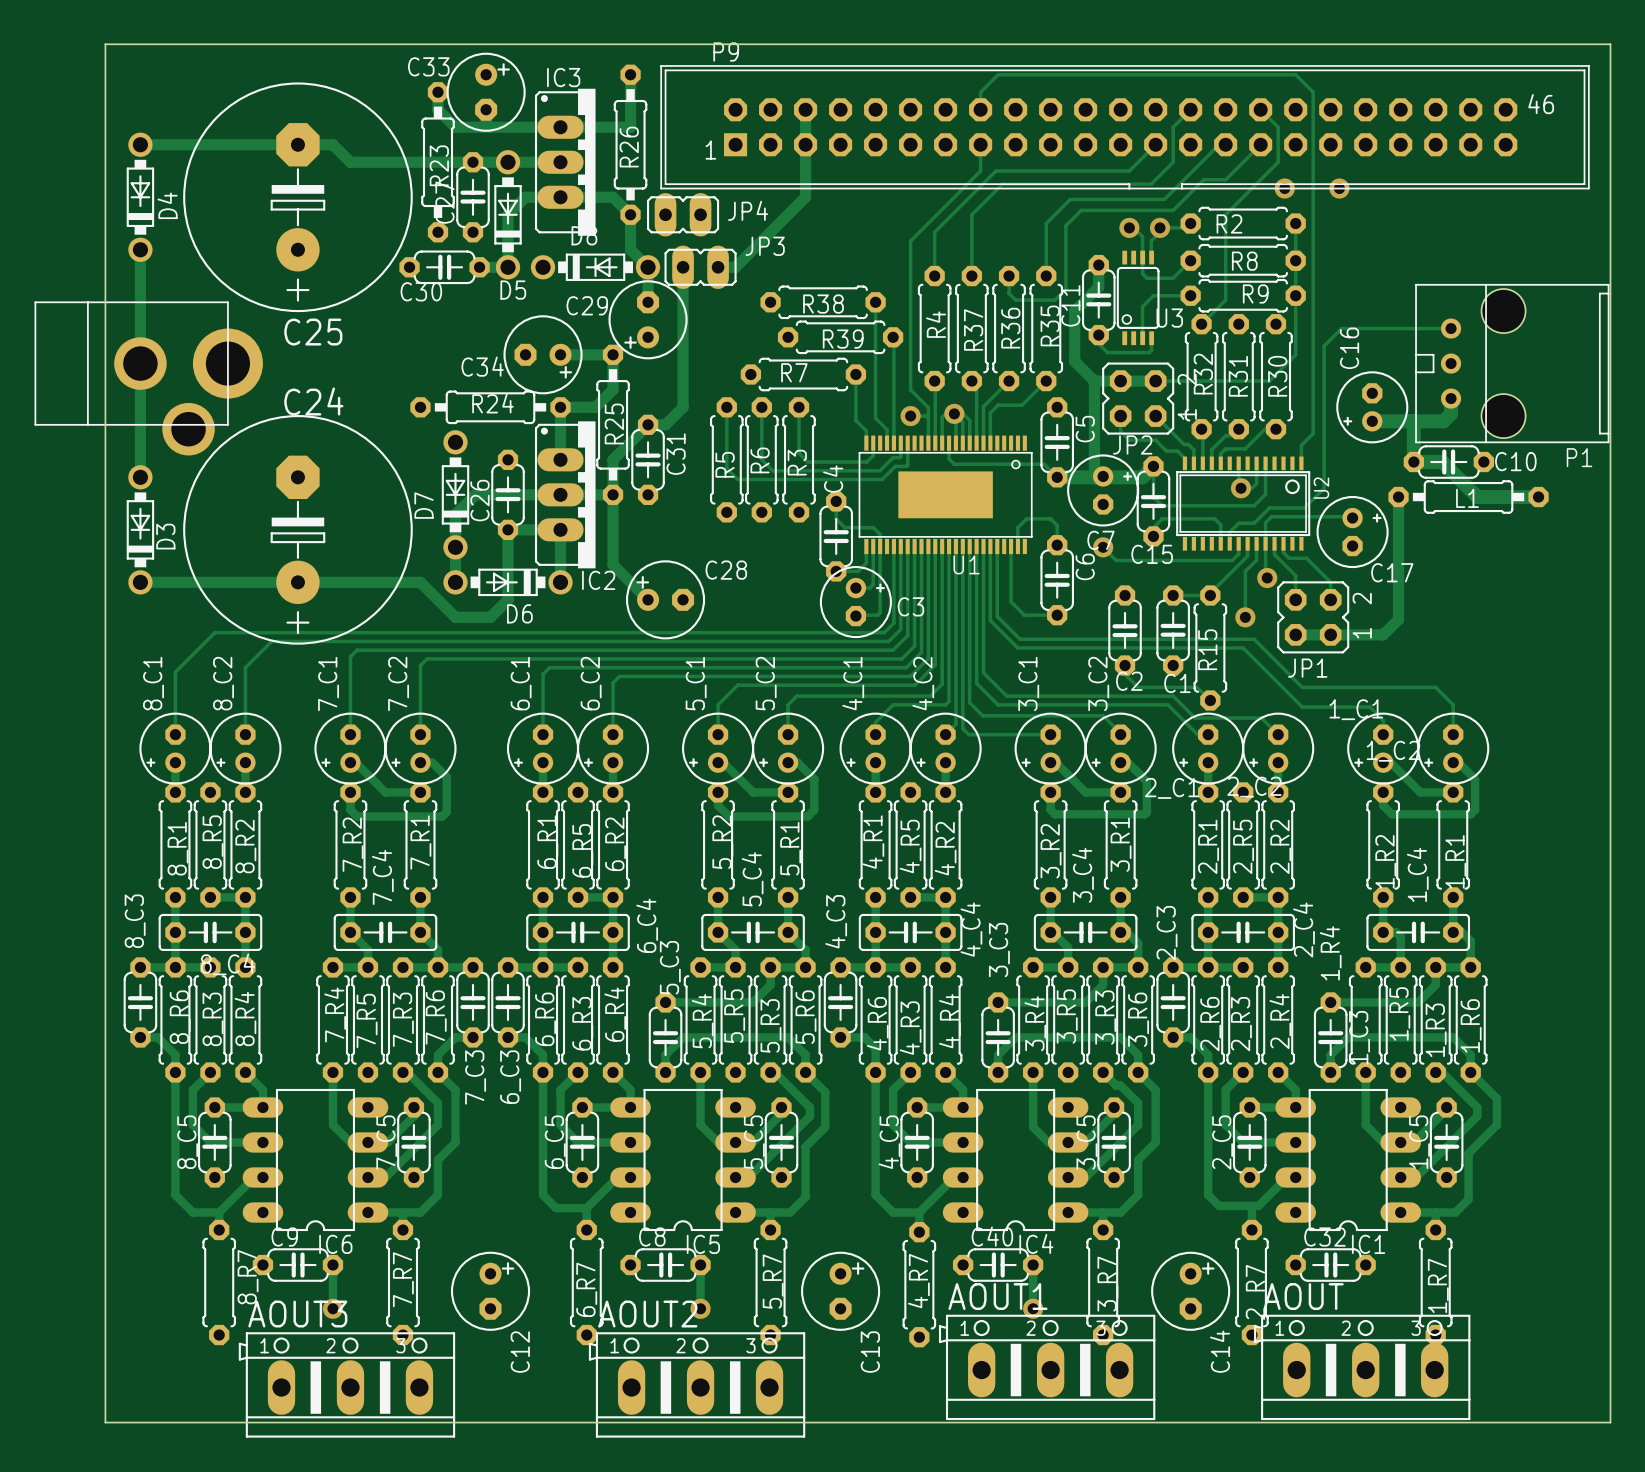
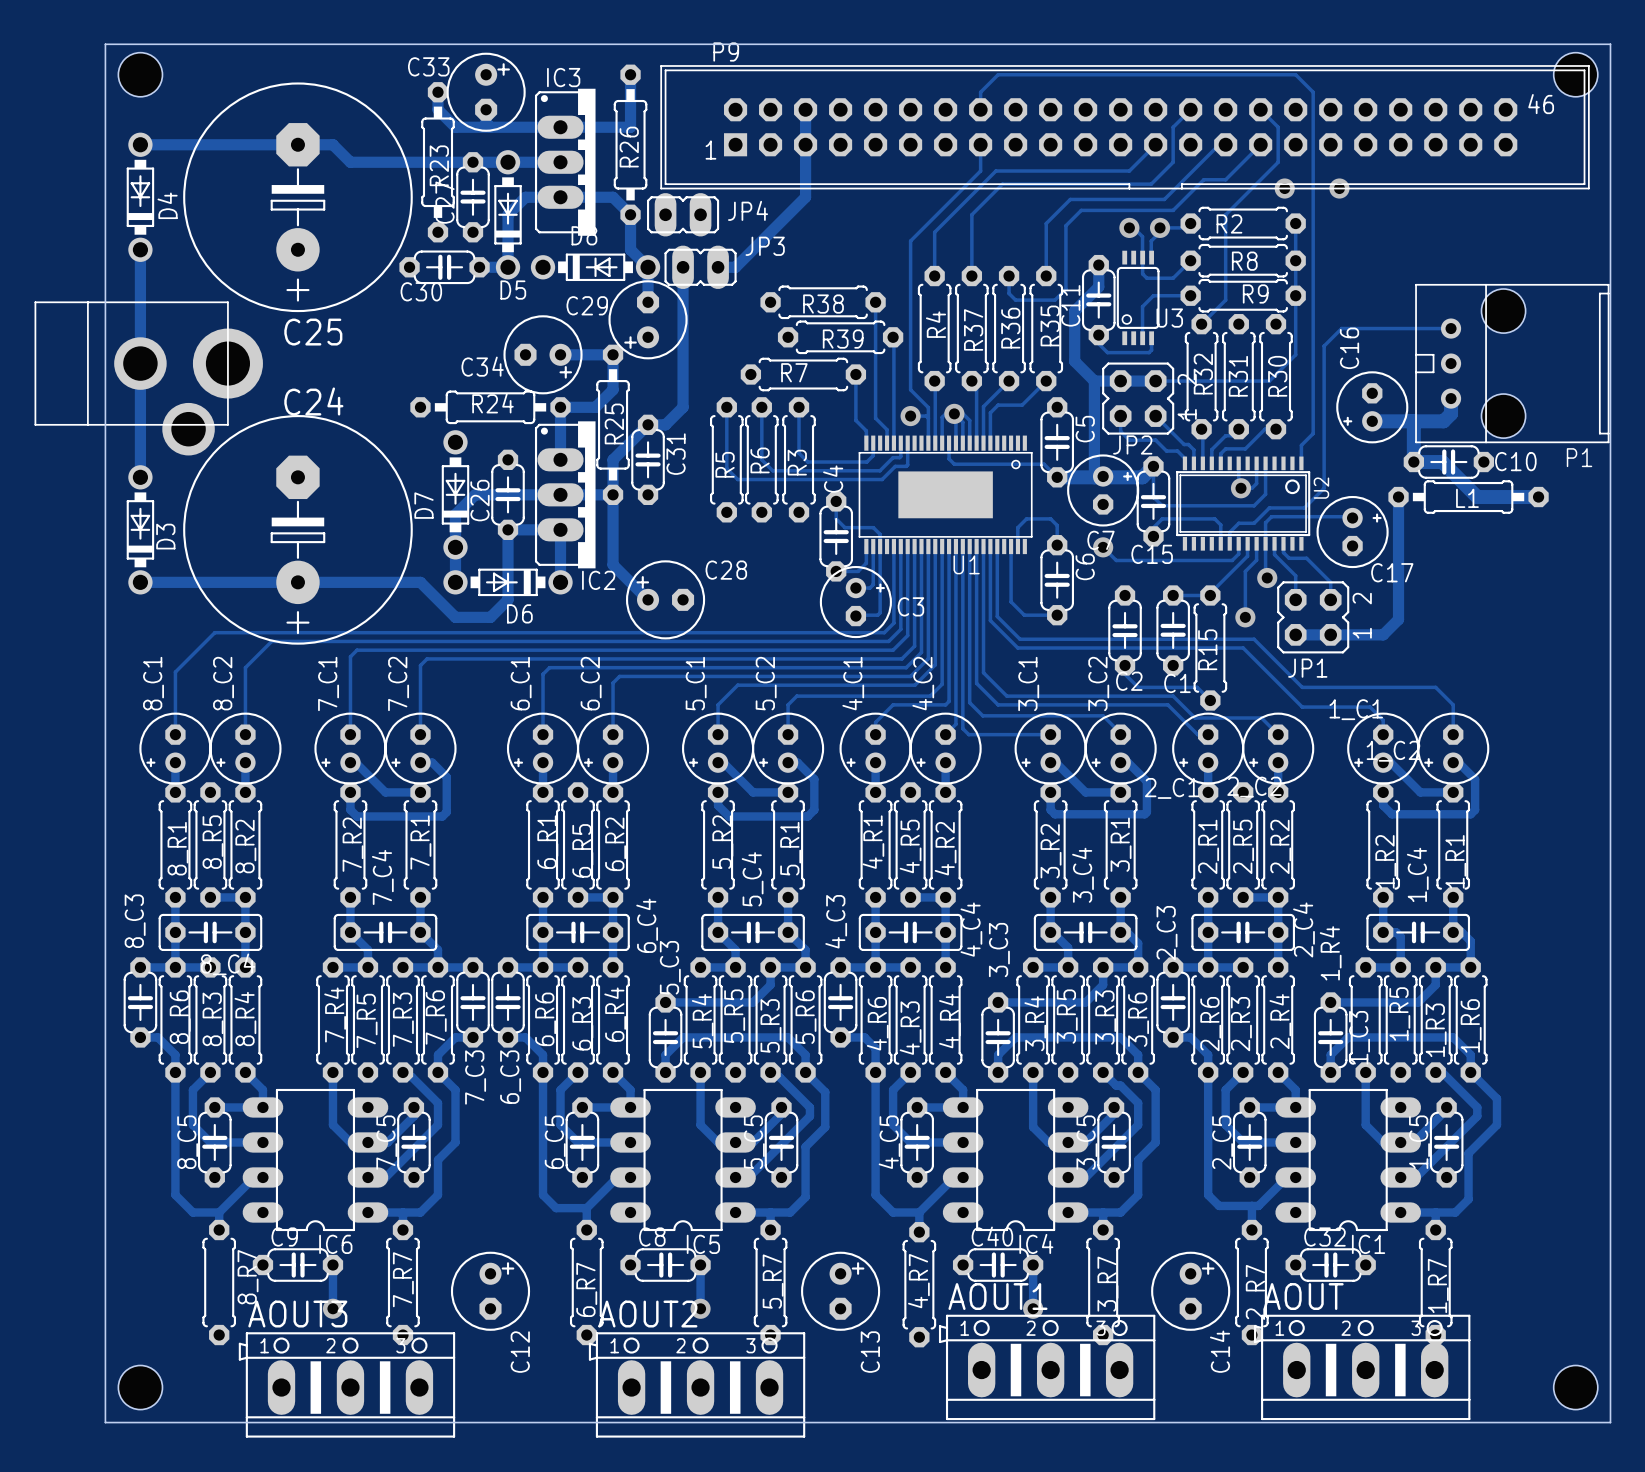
hole: none -> (140, 74)
hole: none -> (1575, 74)
hole: none -> (140, 1387)
hole: none -> (1575, 1387)

